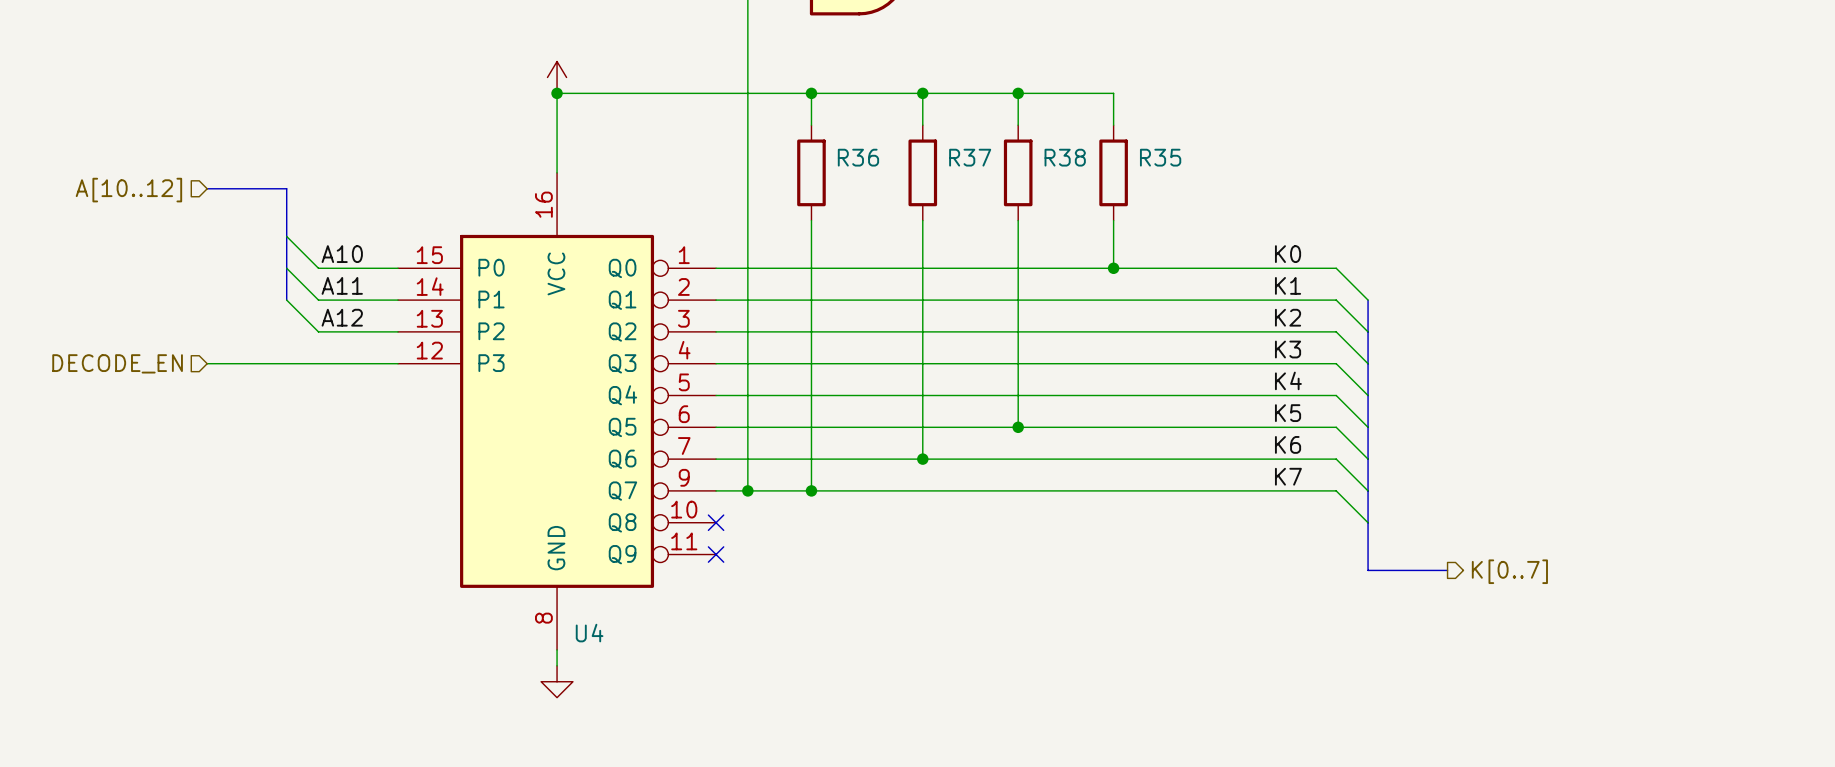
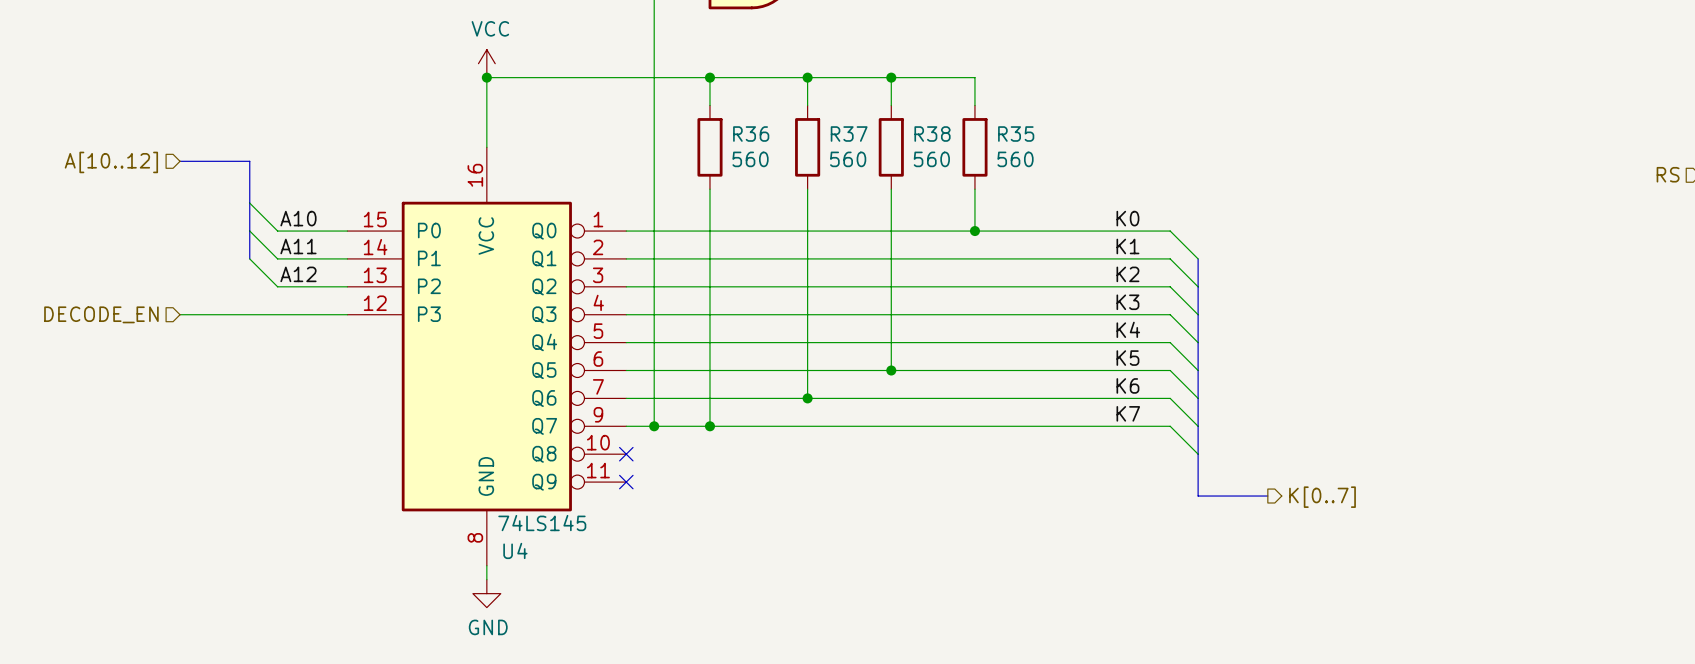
power symbol text: none -> VCC (490, 28)
R36 value: none -> 560 (750, 159)
R37 value: none -> 560 (848, 159)
R38 value: none -> 560 (931, 159)
R35 value: none -> 560 (1015, 159)
U4 value: none -> 74LS145 (542, 523)
power symbol text: none -> GND (488, 627)

